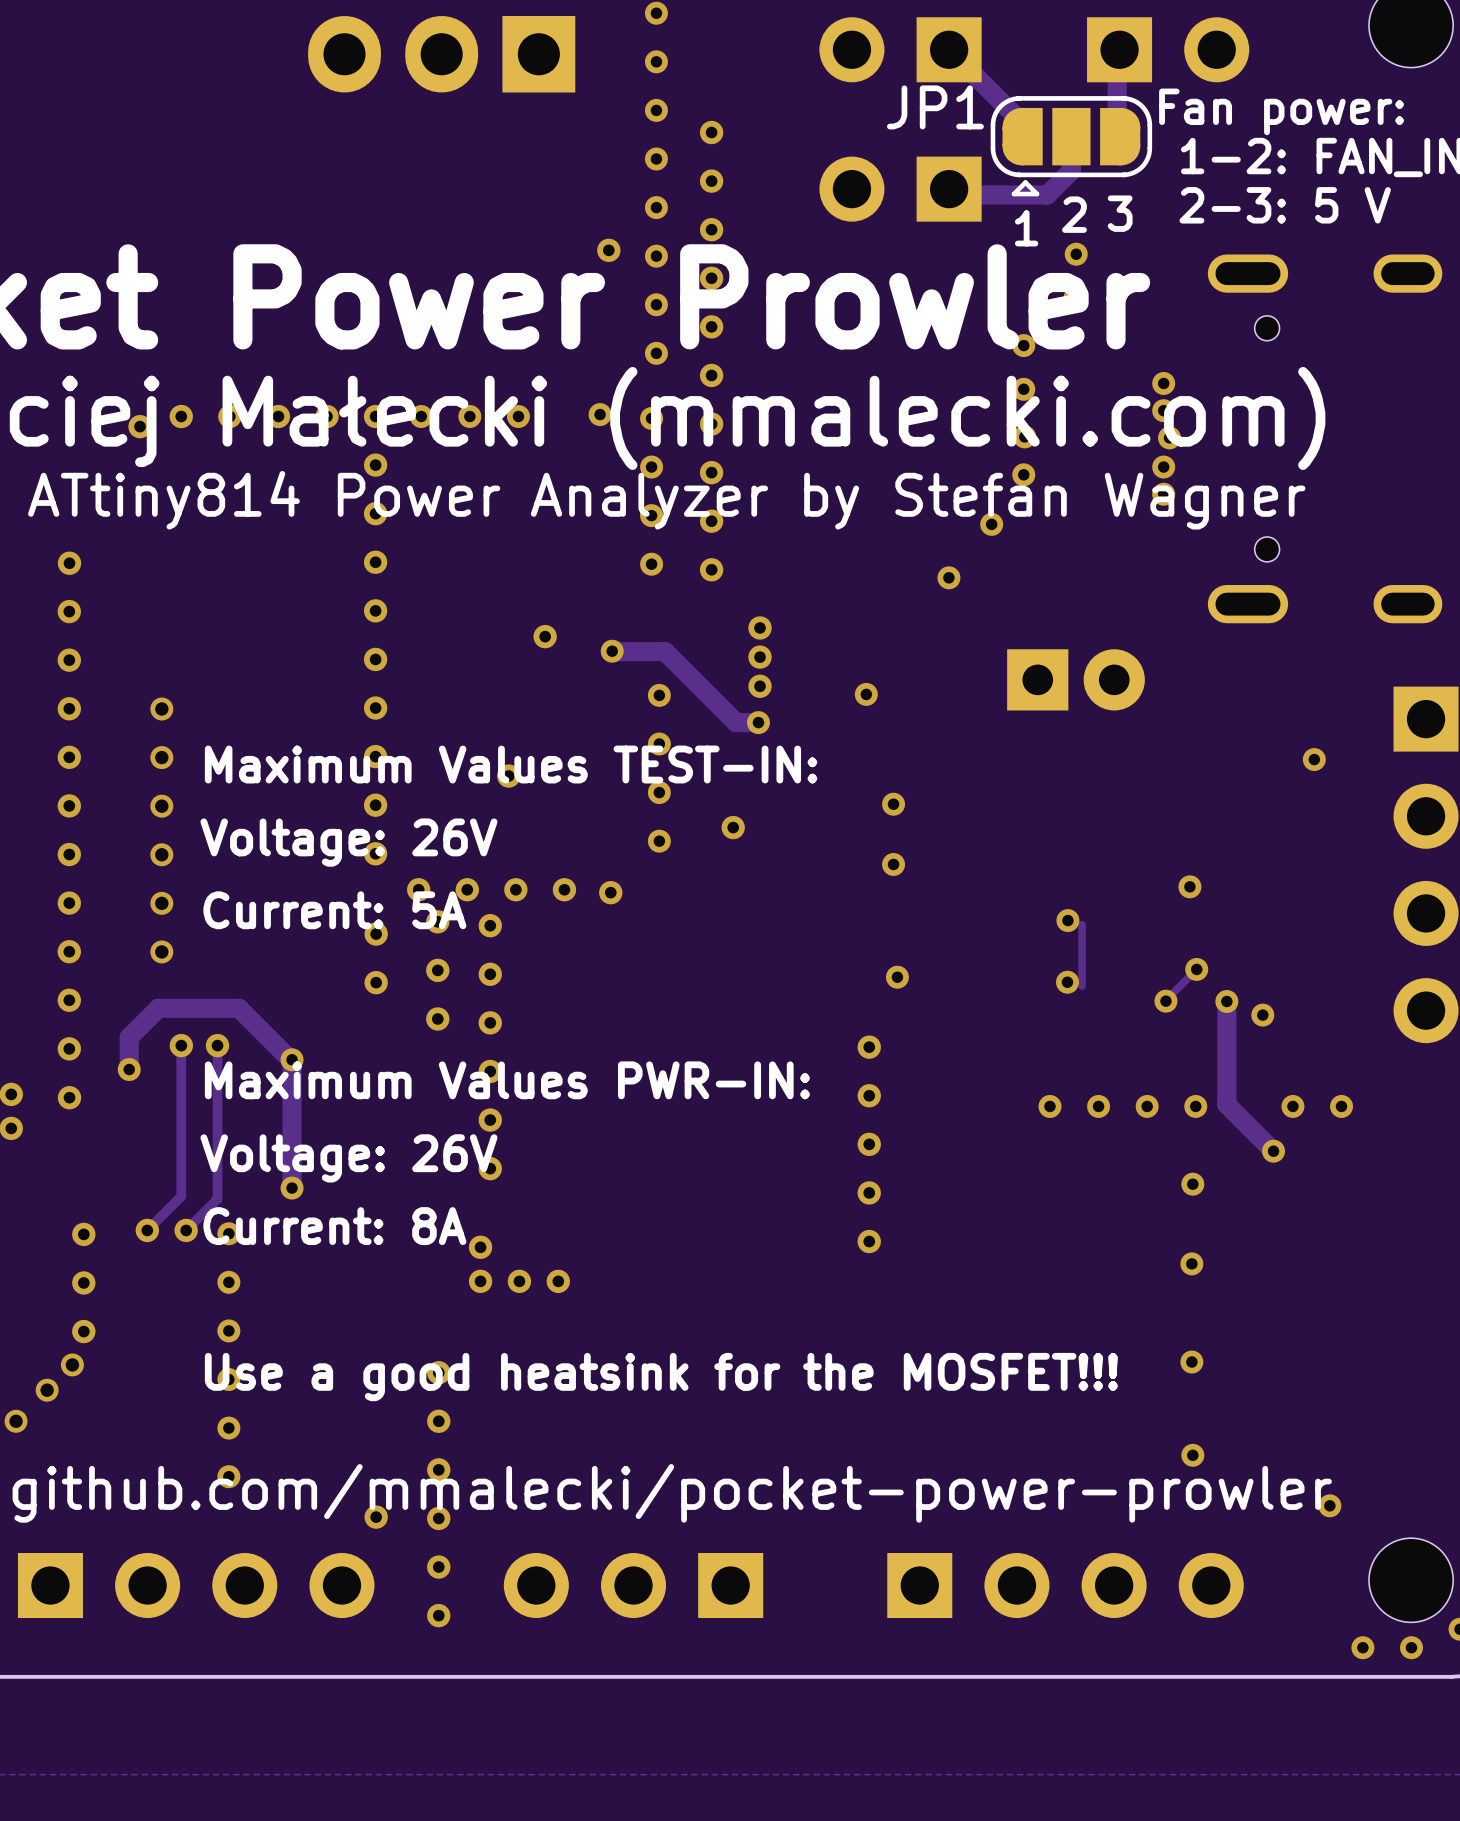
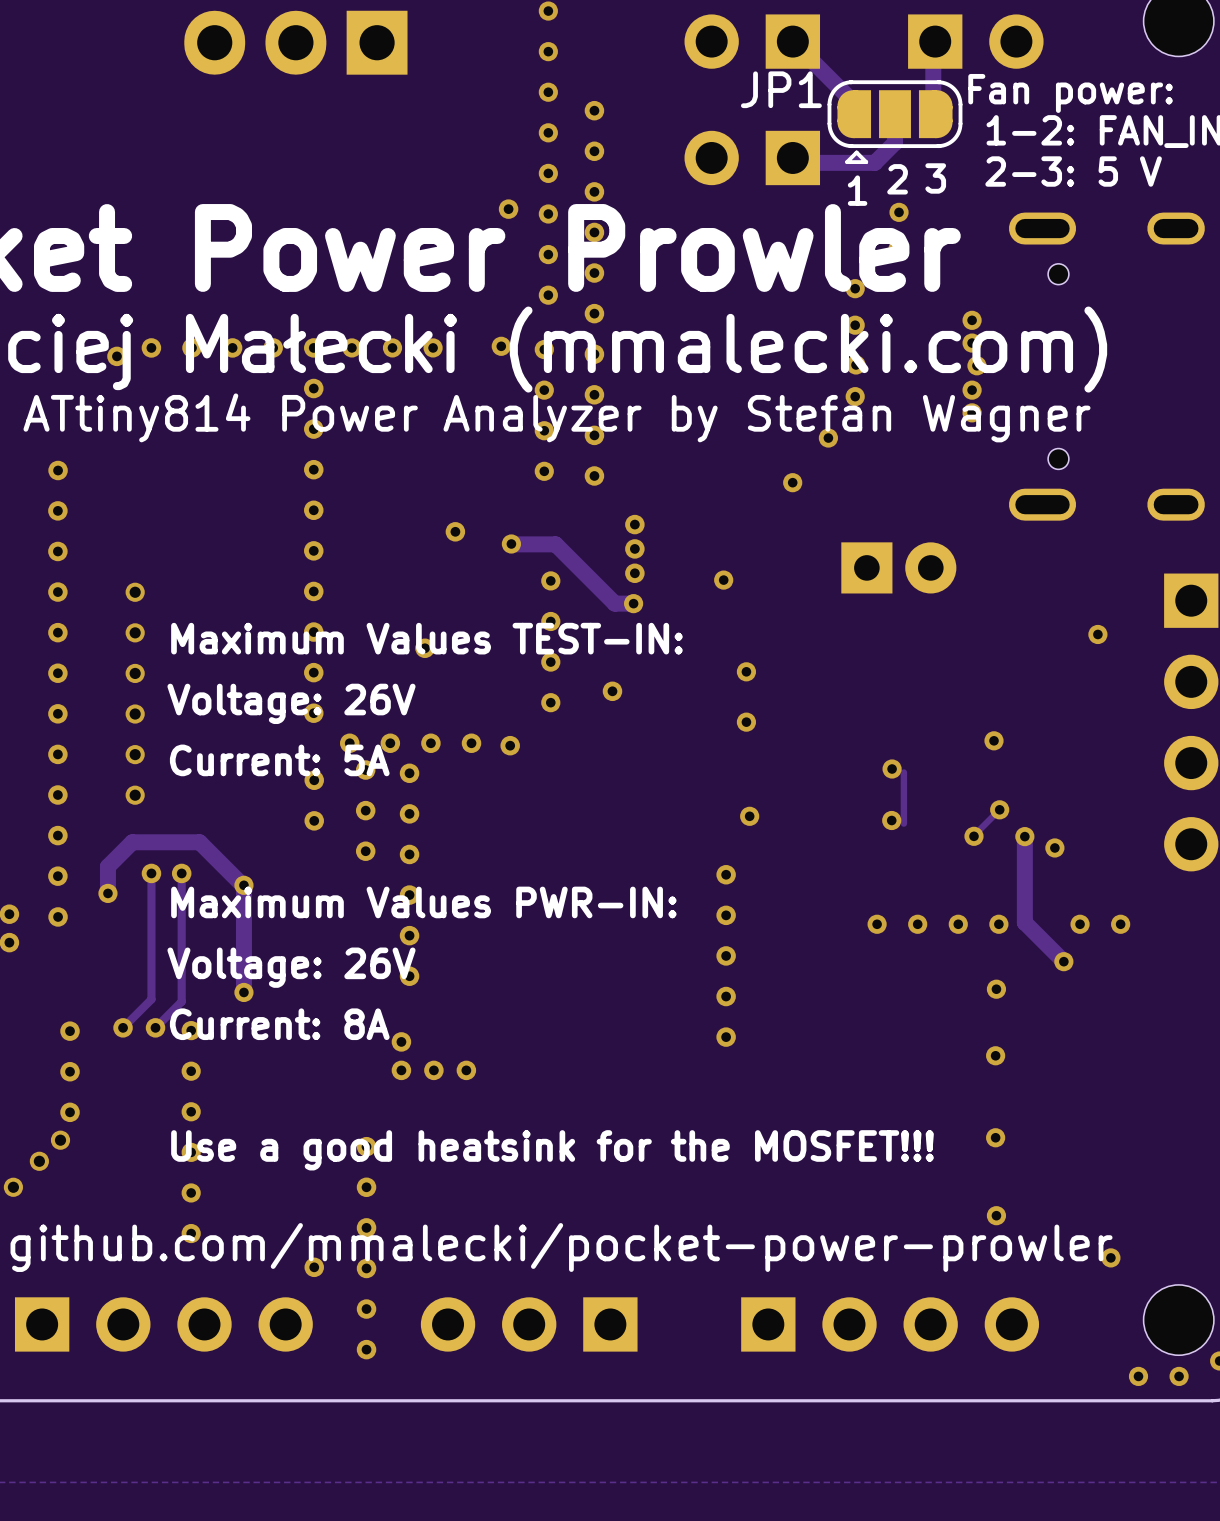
part position: (441, 54) -> (295, 42)

